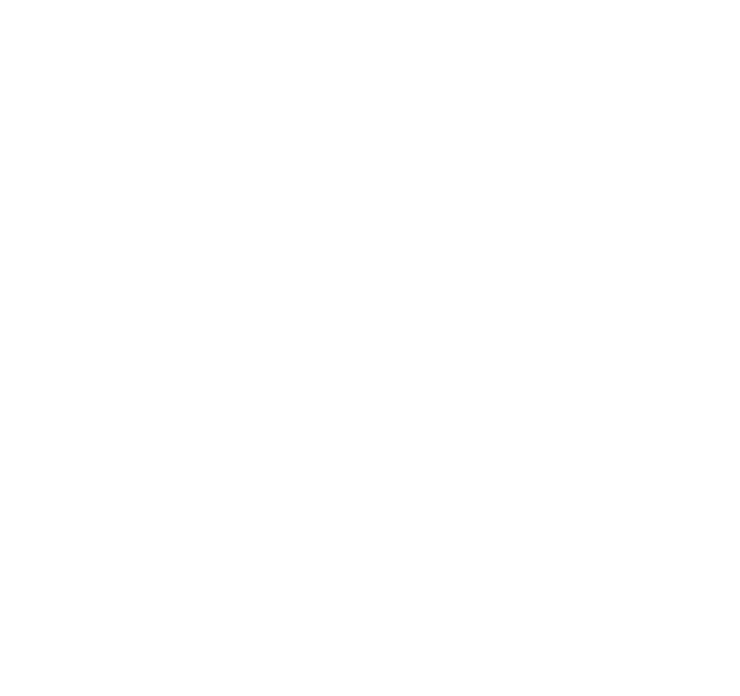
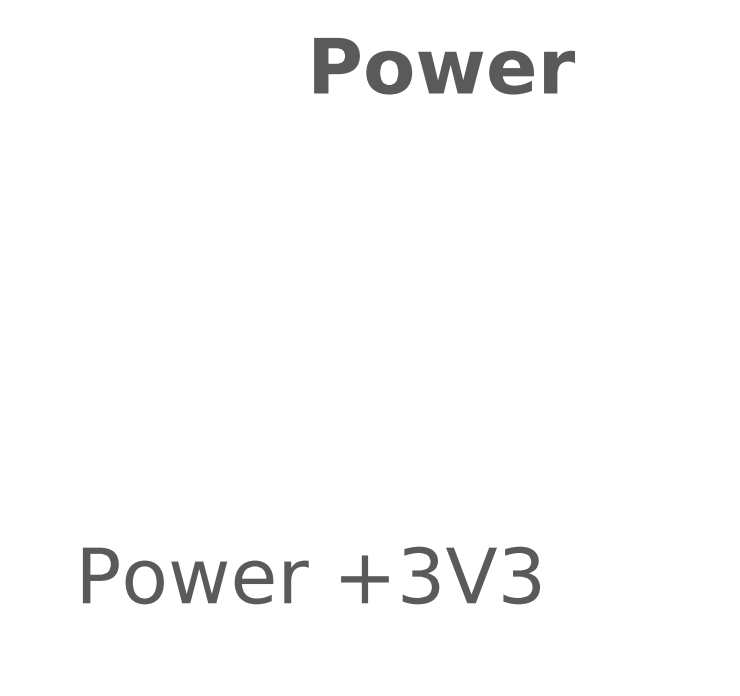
text: none -> Power (444, 66)
text: none -> Power +3V3 (311, 575)

